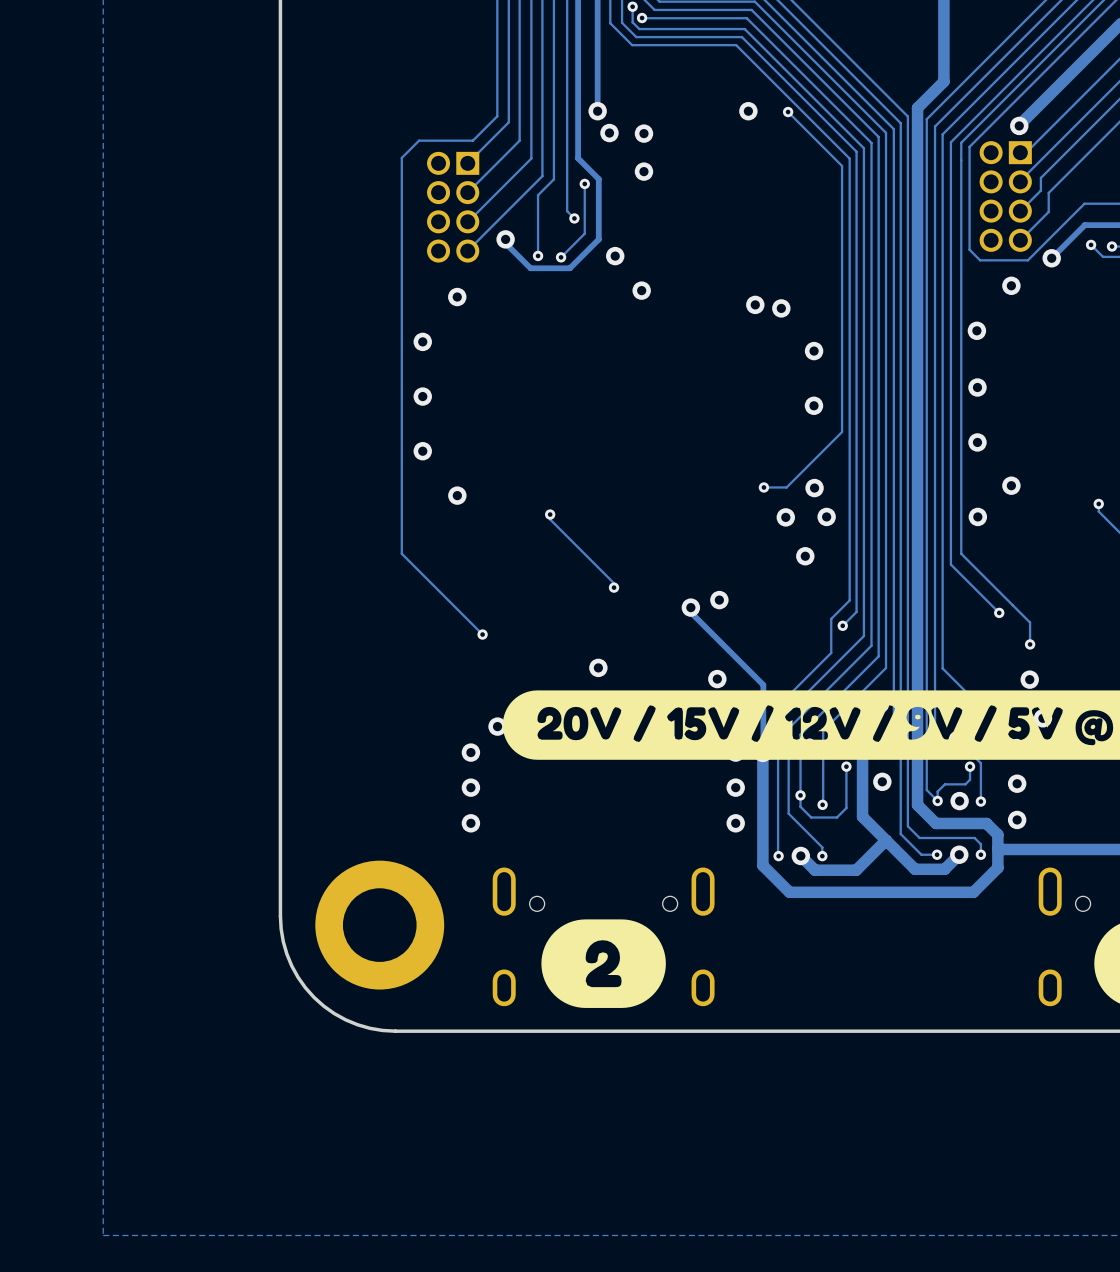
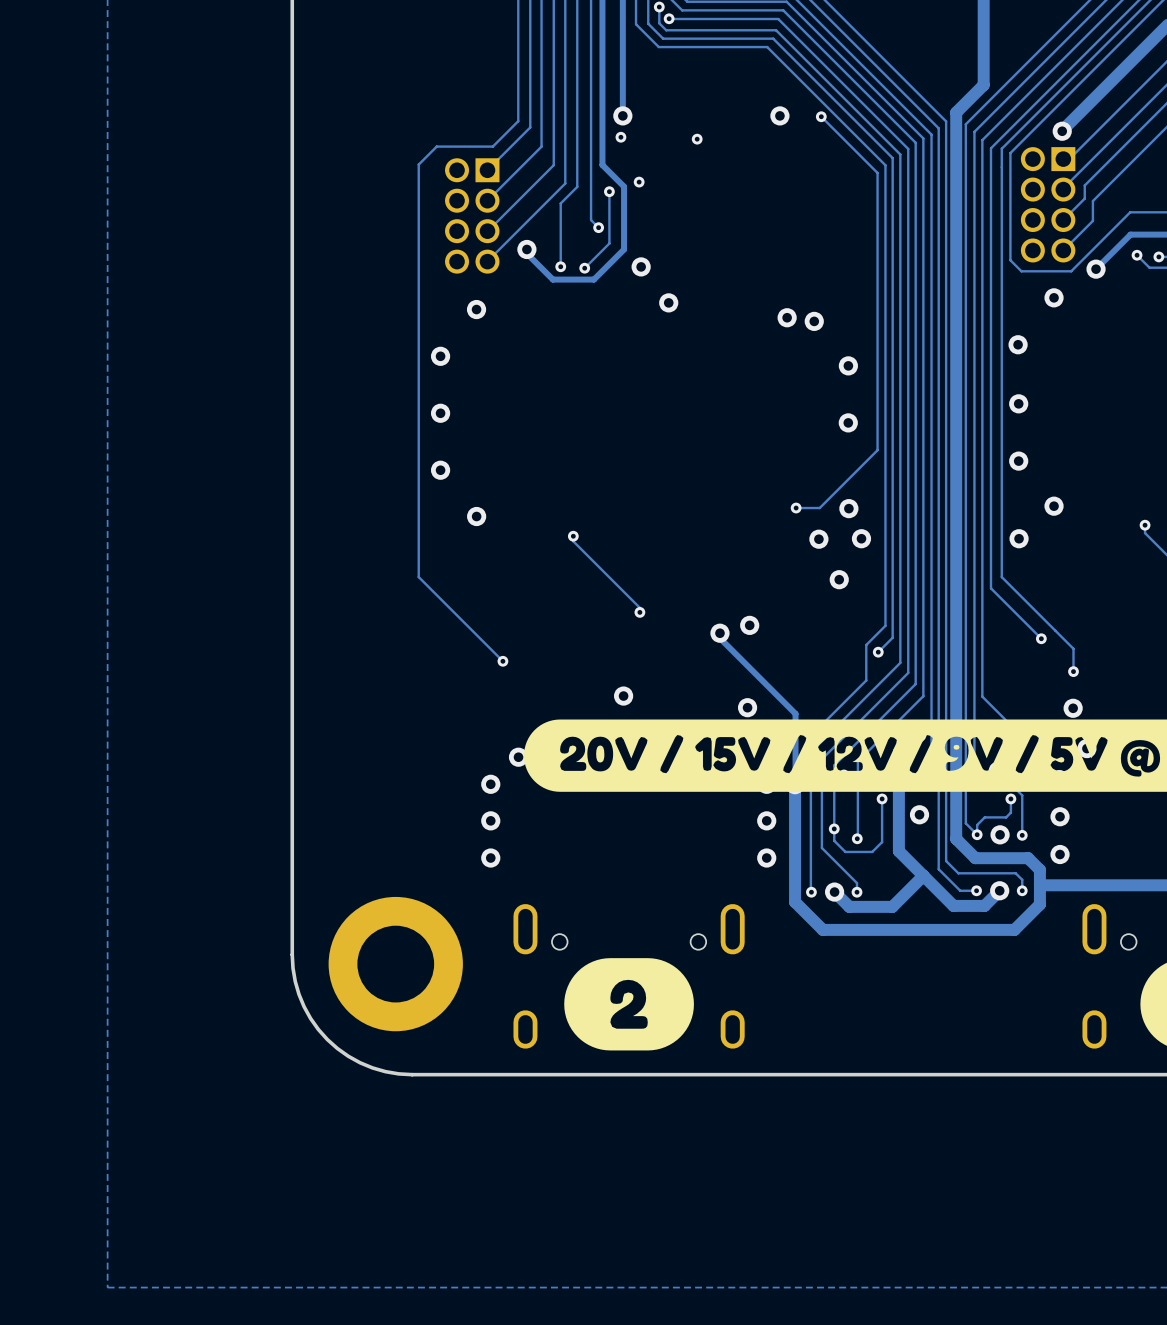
via size: [600, 123, 619, 143] -> [615, 131, 627, 143]
via: (643, 133) -> none
via: none -> (697, 139)
via: (643, 171) -> none
via: none -> (639, 182)

